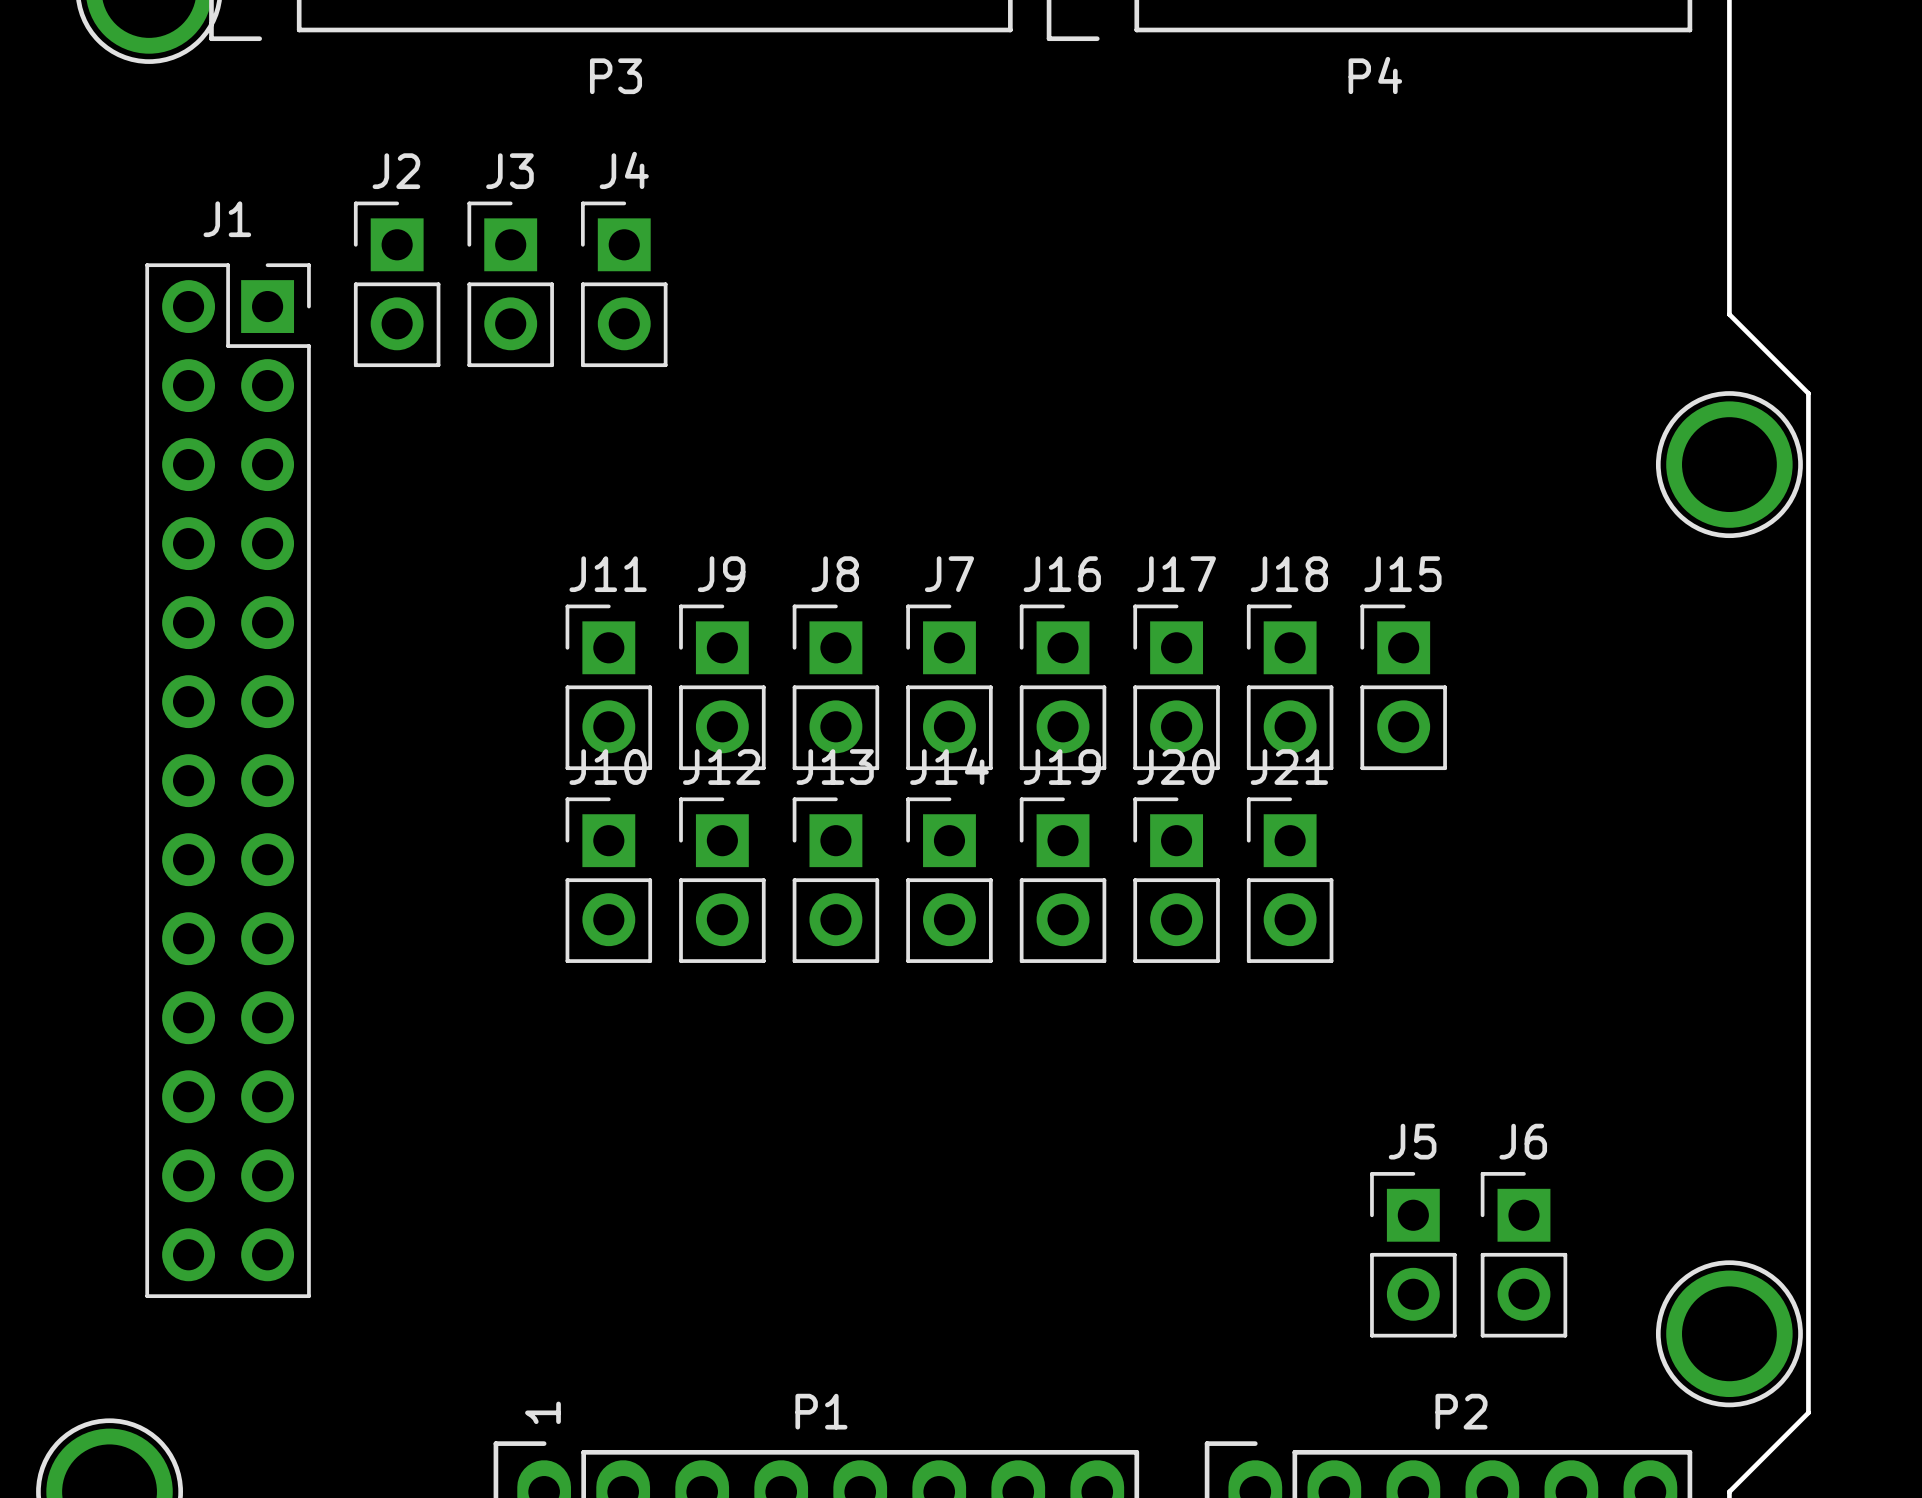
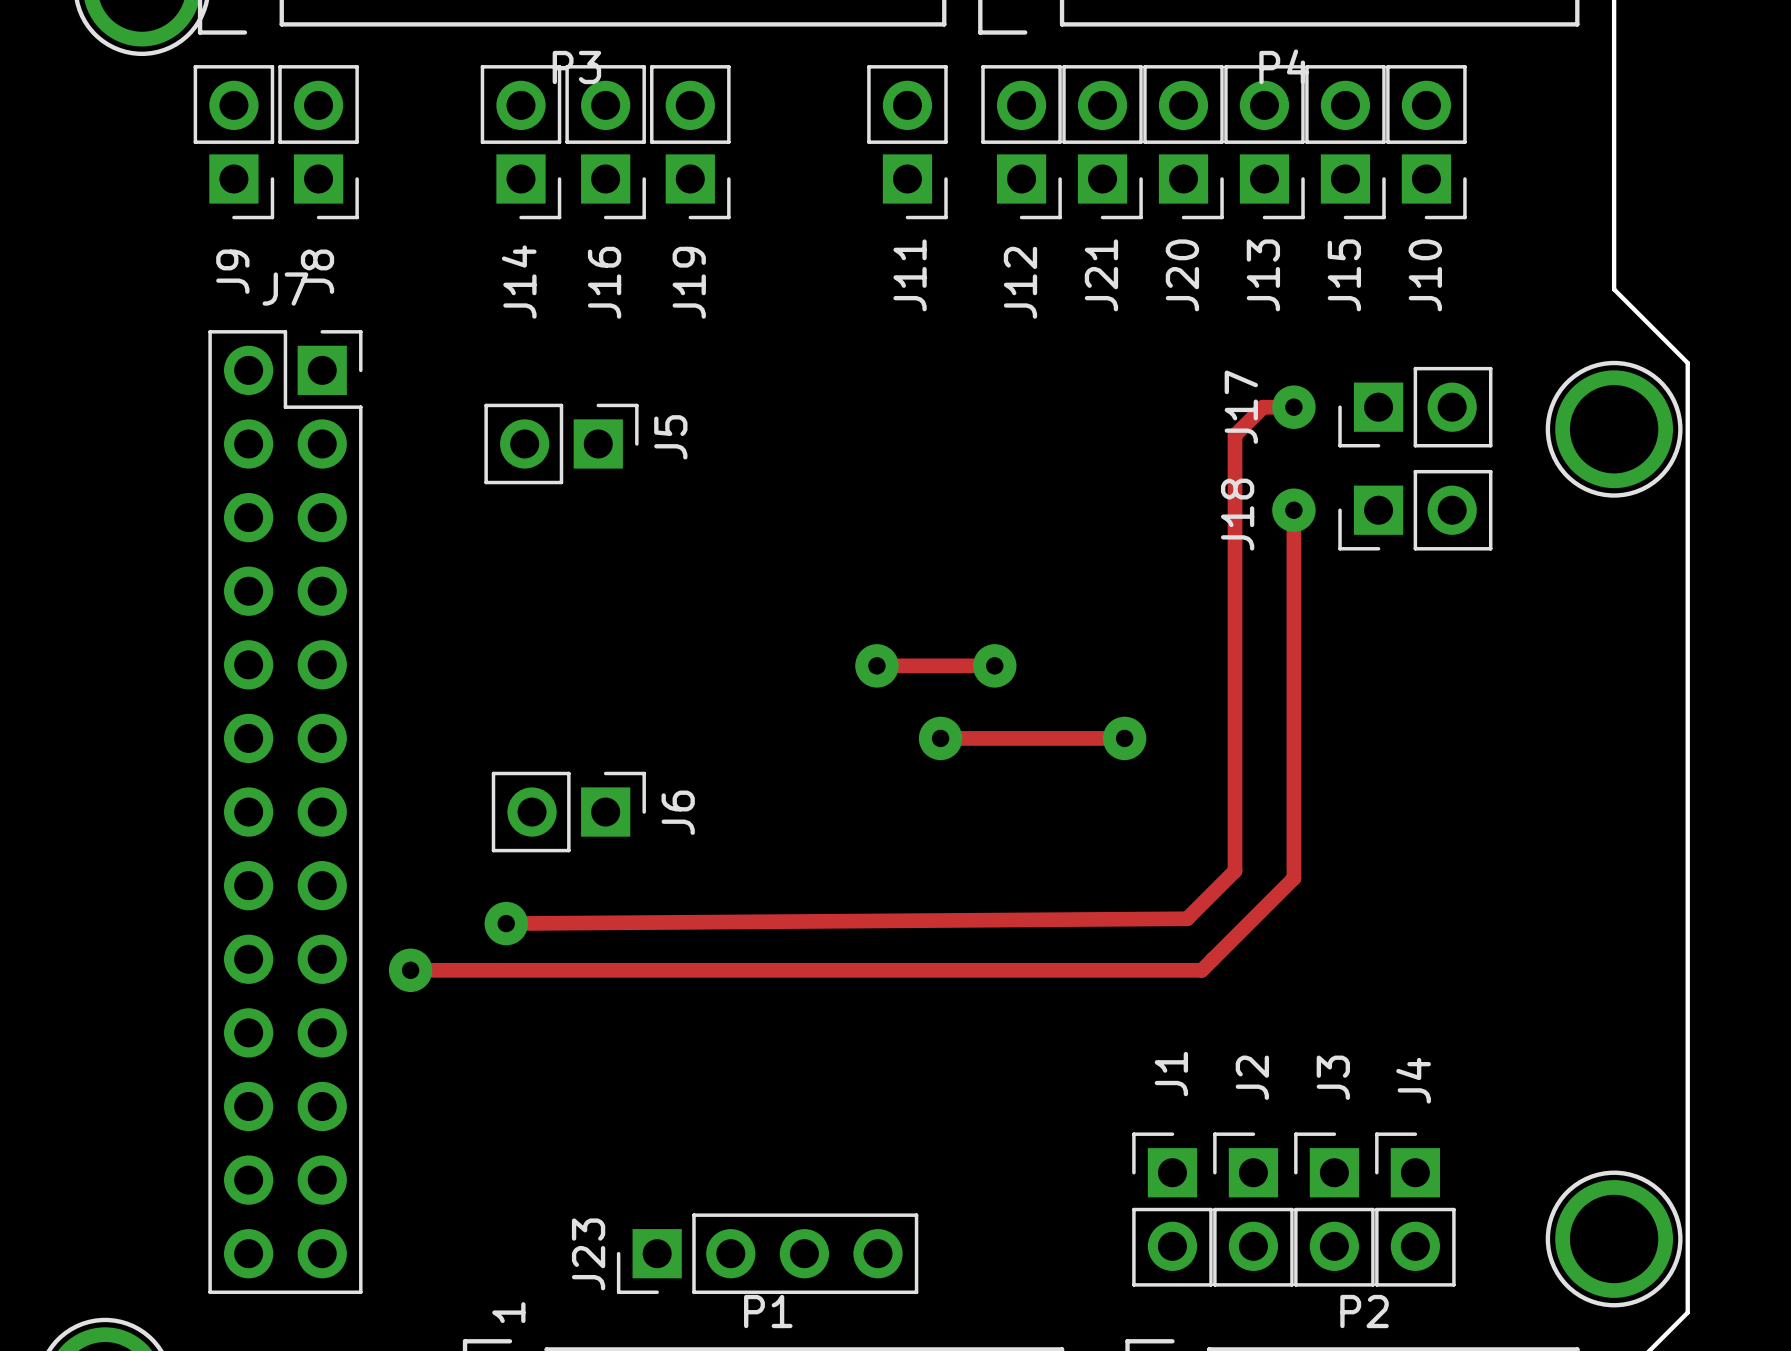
J4 name rotation: 0° (624, 170) -> 90° counterclockwise (1413, 1080)
J2 name rotation: 0° (396, 171) -> 90° counterclockwise (1252, 1077)
J3 name rotation: 0° (509, 171) -> 90° counterclockwise (1333, 1077)
J1 name position: J1 (227, 219) -> J1 (1171, 1074)
J1 footprint: [145, 263, 311, 1299] -> [1132, 1132, 1213, 1287]
J2 position: (397, 284) -> (1253, 1209)
J3 position: (510, 284) -> (1334, 1209)
J4 position: (624, 284) -> (1415, 1209)
track: none -> (1293, 407) (1263, 407) (1235, 435) (1235, 870) (1187, 918) (506, 923) (506, 918)
via: none -> (1293, 407)
track: none -> (1293, 510) (1293, 878) (1201, 970) (410, 970)
via: none -> (1293, 510)
J7 name position: J7 (949, 574) -> J7 (285, 289)
J17 name position: J17 (1176, 574) -> J17 (1241, 407)
J18 name position: J18 (1289, 574) -> J18 (1237, 514)
J7 footprint: [906, 604, 993, 771] -> [208, 330, 363, 1294]
J11 rotation: 0° (608, 687) -> 180° (907, 142)
J11 position: (608, 687) -> (907, 142)
J9 rotation: 0° (722, 687) -> 180° (233, 142)
J9 position: (722, 687) -> (233, 142)
J8 rotation: 0° (835, 687) -> 180° (318, 142)
J8 position: (835, 687) -> (318, 142)
J16 rotation: 0° (1063, 687) -> 180° (605, 142)
J16 position: (1063, 687) -> (605, 142)
J17 rotation: 0° (1176, 687) -> 90° counterclockwise (1415, 407)
J17 position: (1176, 687) -> (1415, 407)
J18 rotation: 0° (1290, 687) -> 90° counterclockwise (1415, 510)
J18 position: (1290, 687) -> (1415, 510)
J15 rotation: 0° (1403, 687) -> 180° (1345, 142)
J15 position: (1403, 687) -> (1345, 142)
track: none -> (876, 665) (994, 665)
via: none -> (876, 665)
via: none -> (994, 665)
track: none -> (940, 738) (1124, 738)
via: none -> (940, 738)
via: none -> (1124, 738)
J10 rotation: 0° (608, 880) -> 180° (1426, 142)
J10 position: (608, 880) -> (1426, 142)
J12 rotation: 0° (722, 880) -> 180° (1021, 142)
J12 position: (722, 880) -> (1021, 142)
J13 rotation: 0° (835, 880) -> 180° (1264, 142)
J13 position: (835, 880) -> (1264, 142)
J14 rotation: 0° (949, 880) -> 180° (521, 142)
J14 position: (949, 880) -> (521, 142)
J19 rotation: 0° (1063, 880) -> 180° (690, 142)
J19 position: (1063, 880) -> (690, 142)
J20 rotation: 0° (1176, 880) -> 180° (1183, 142)
J20 position: (1176, 880) -> (1183, 142)
J21 rotation: 0° (1290, 880) -> 180° (1102, 142)
J21 position: (1290, 880) -> (1102, 142)
via: none -> (506, 923)
via: none -> (410, 970)
J5 rotation: 0° (1413, 1254) -> 90° clockwise (561, 443)
J5 position: (1413, 1254) -> (561, 443)
J6 rotation: 0° (1523, 1254) -> 90° clockwise (568, 812)
J6 position: (1523, 1254) -> (568, 812)
J23: none -> (767, 1253)

